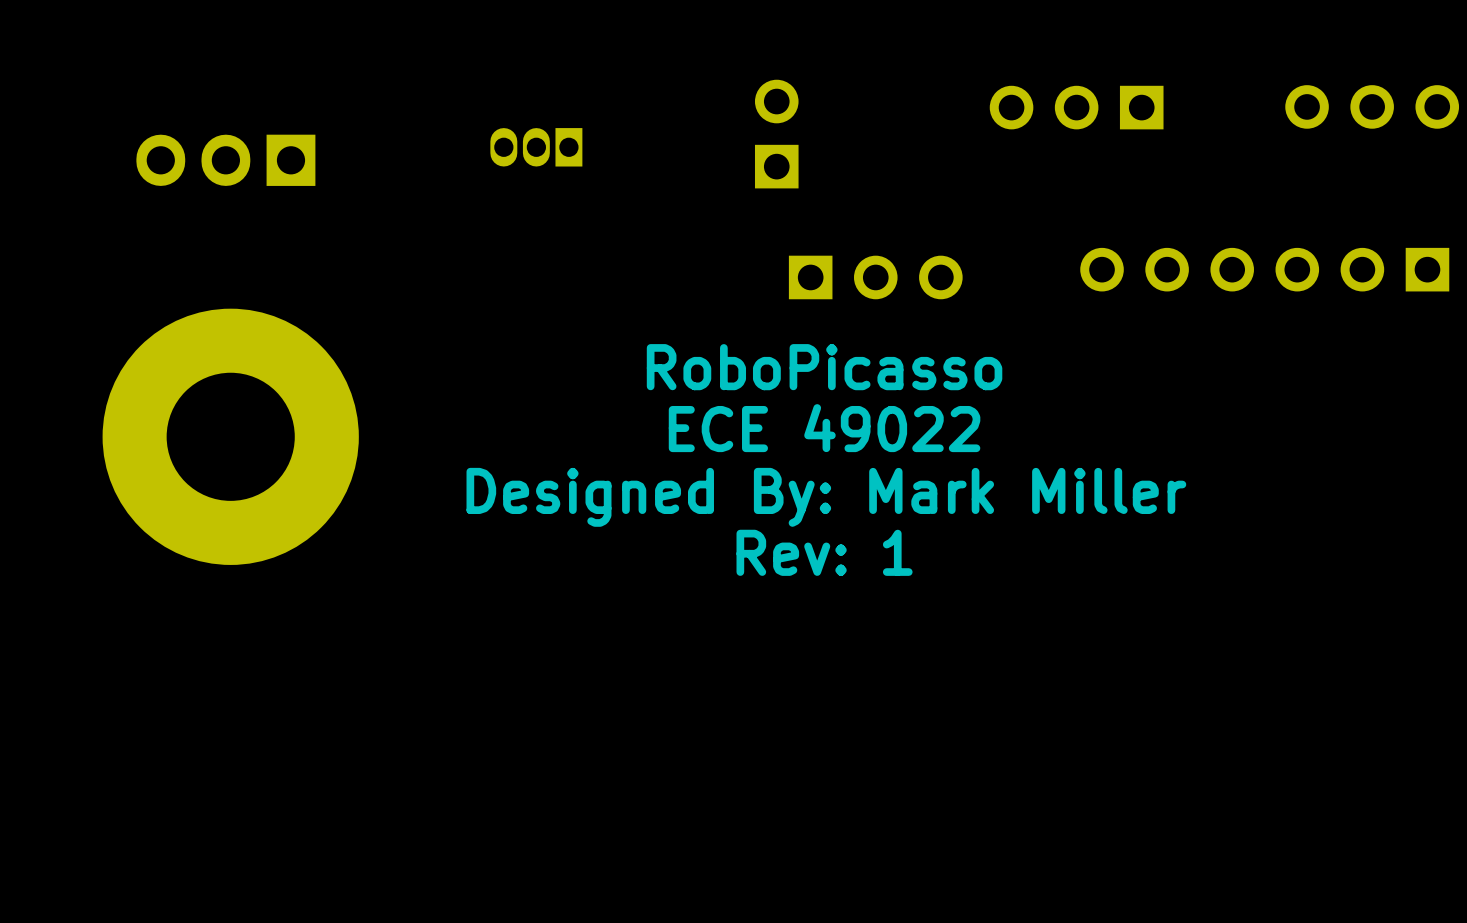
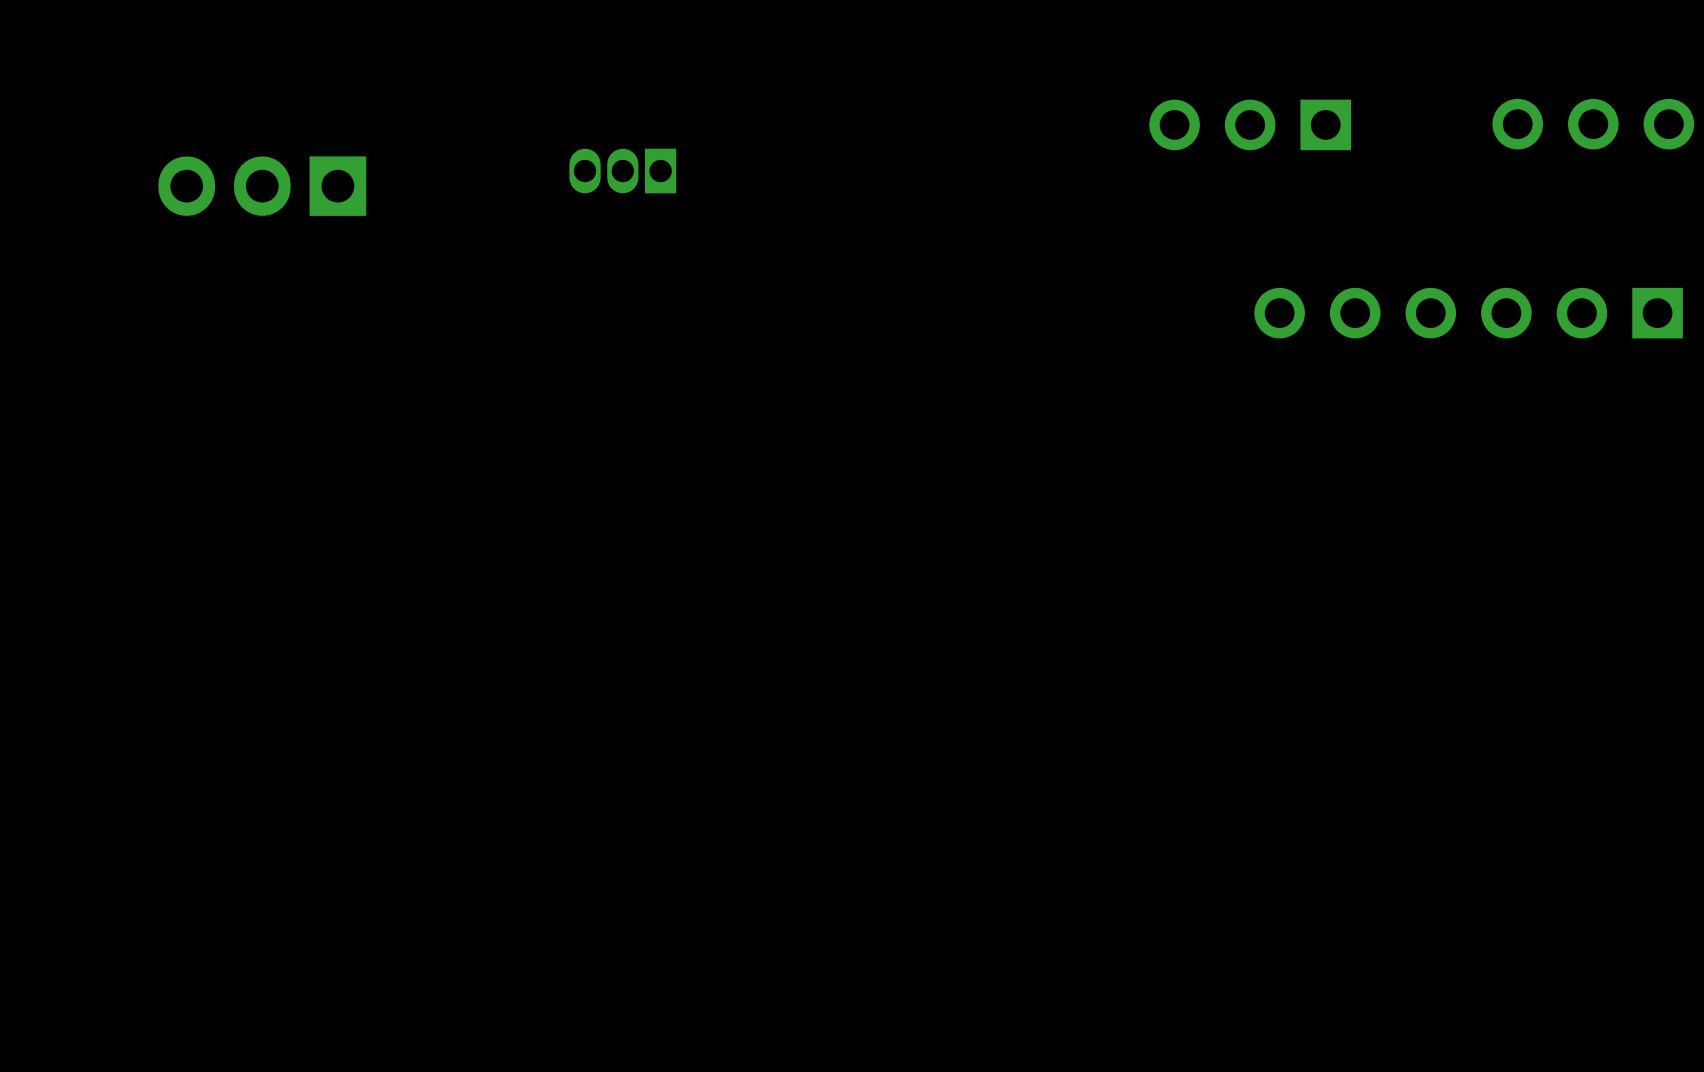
part: (776, 134) -> none
part: (875, 277) -> none
text: RoboPicasso (824, 367) -> none
text: ECE 49022 (824, 428) -> none
part: (230, 436) -> none
text: Designed By: Mark Miller (826, 497) -> none
text: Rev: 1 (824, 552) -> none

